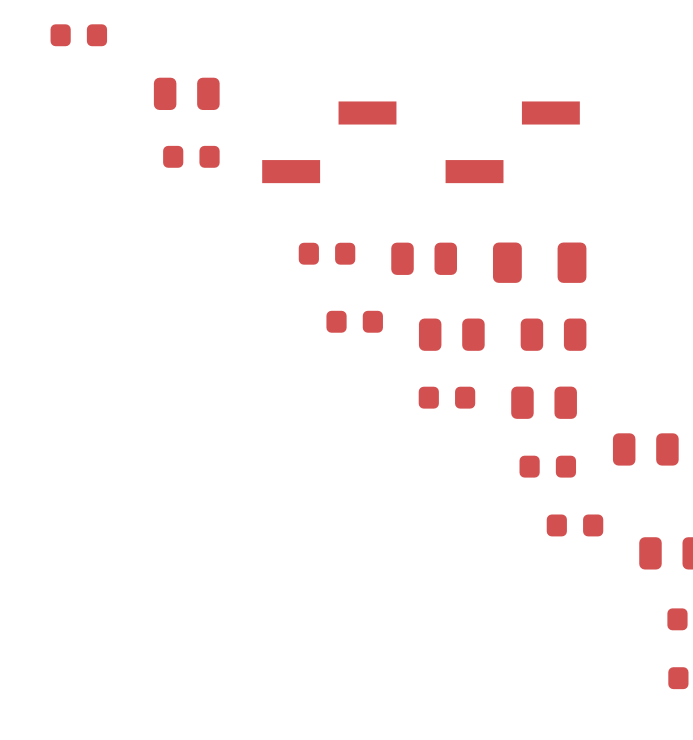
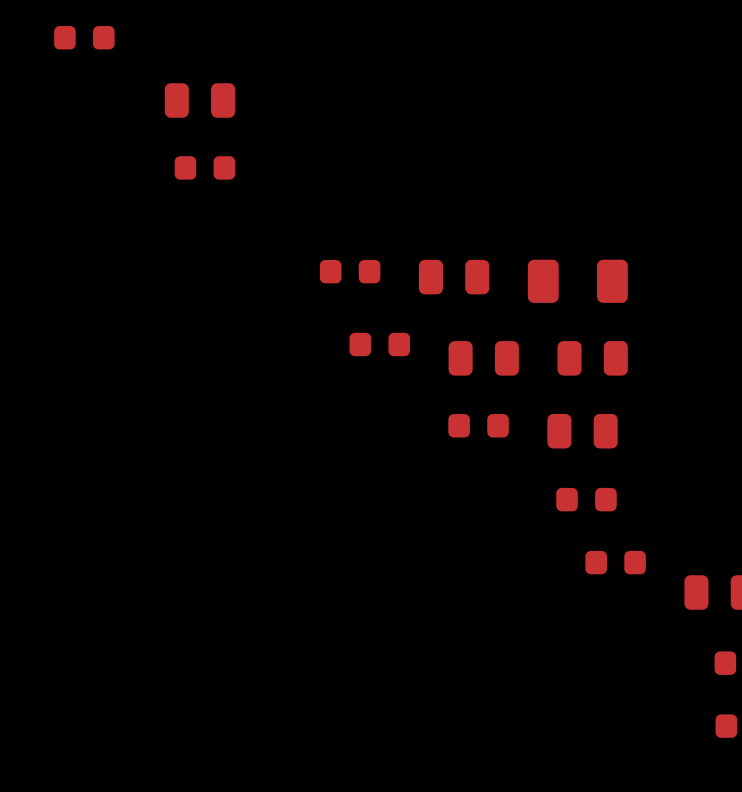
part: (329, 142) -> none
part: (512, 142) -> none
part: (645, 449) -> none

